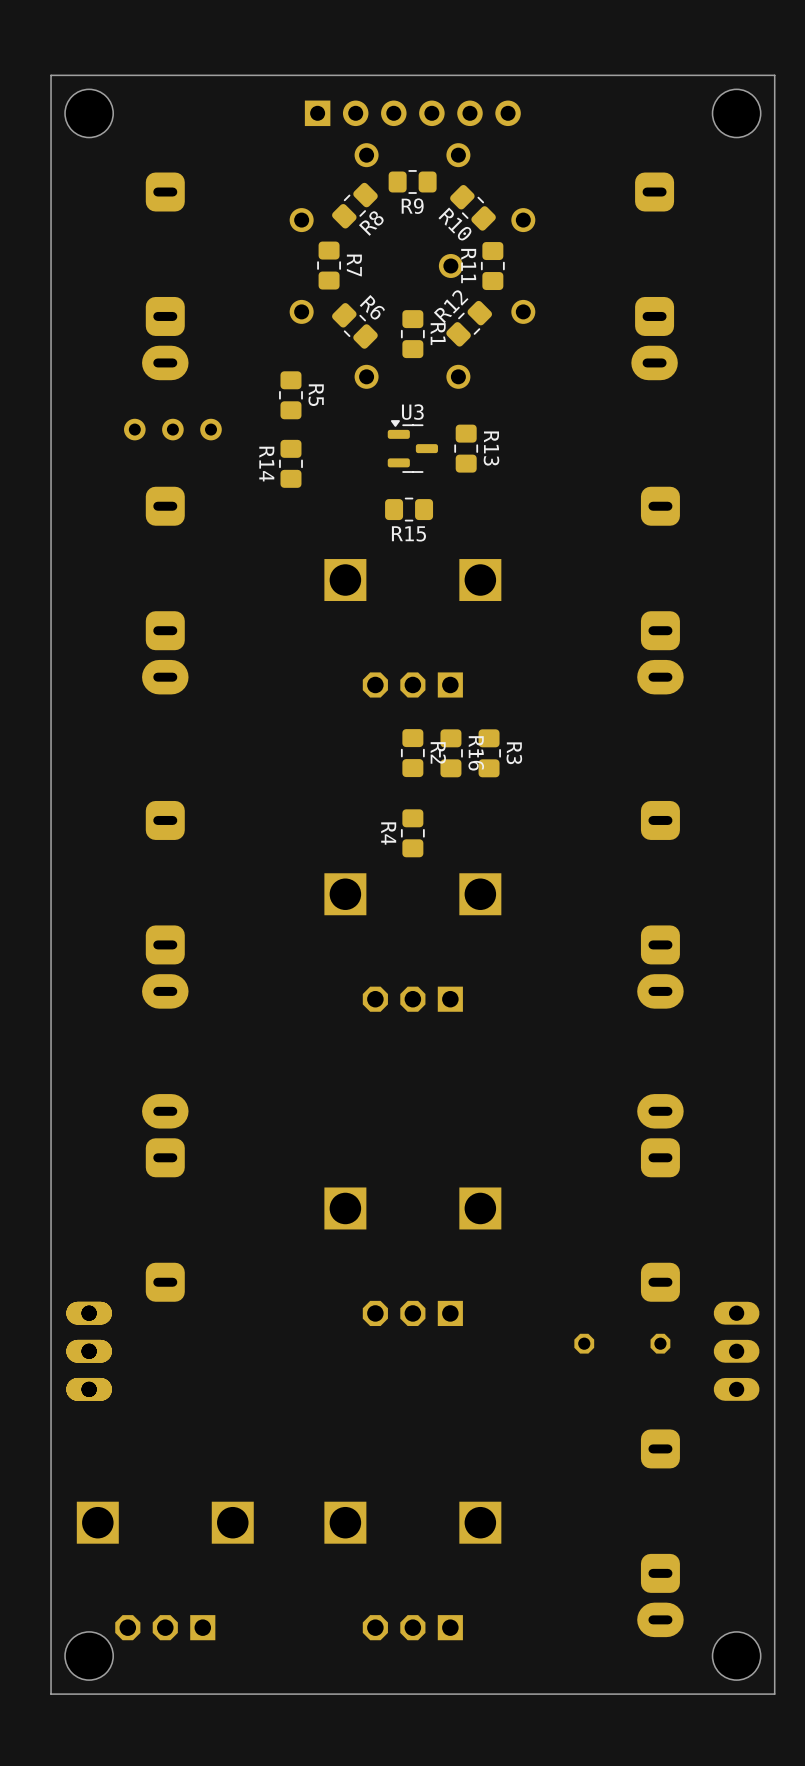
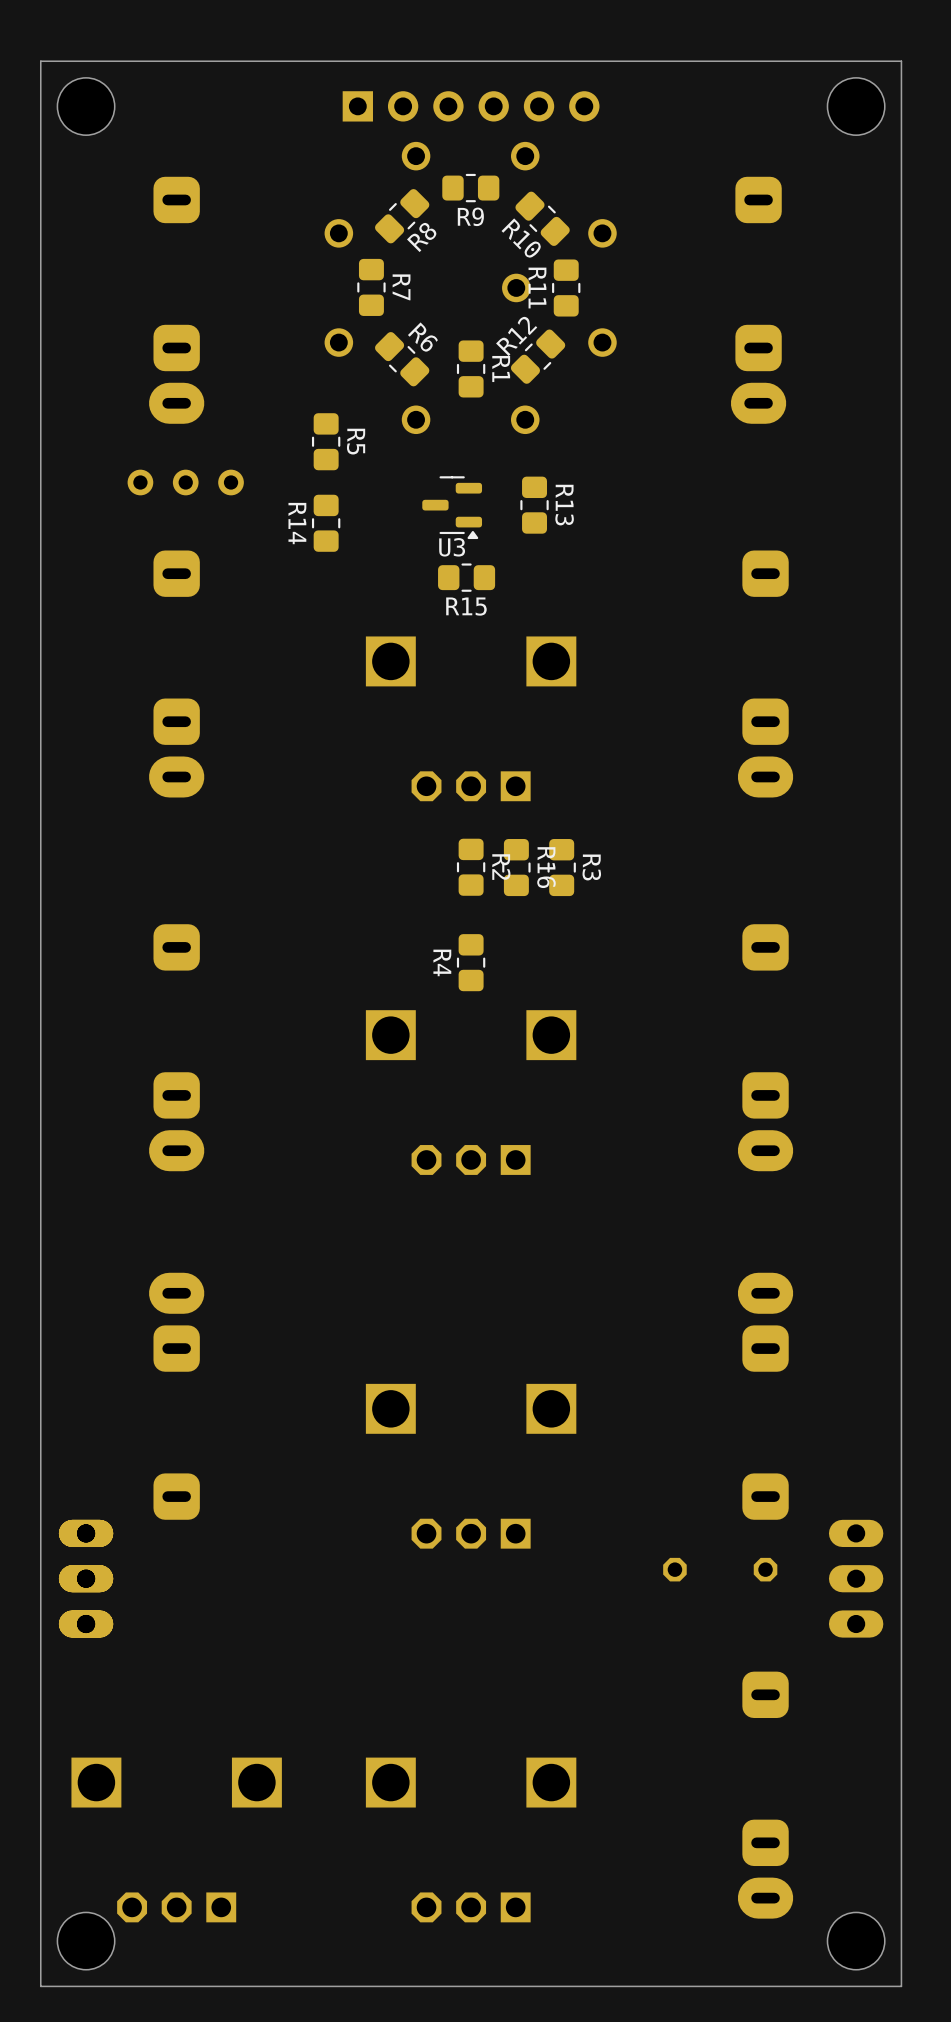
U3 rotation: 0° (412, 446) -> 180° (452, 507)

